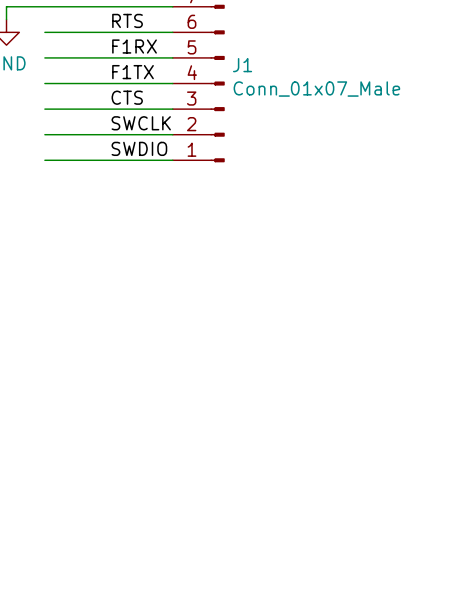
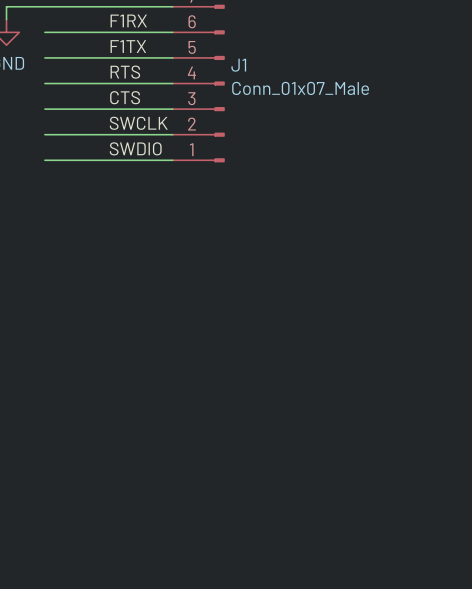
label: RTS (127, 20) -> F1RX (128, 20)
label: F1RX (134, 46) -> F1TX (128, 46)
label: F1TX (133, 72) -> RTS (125, 72)

